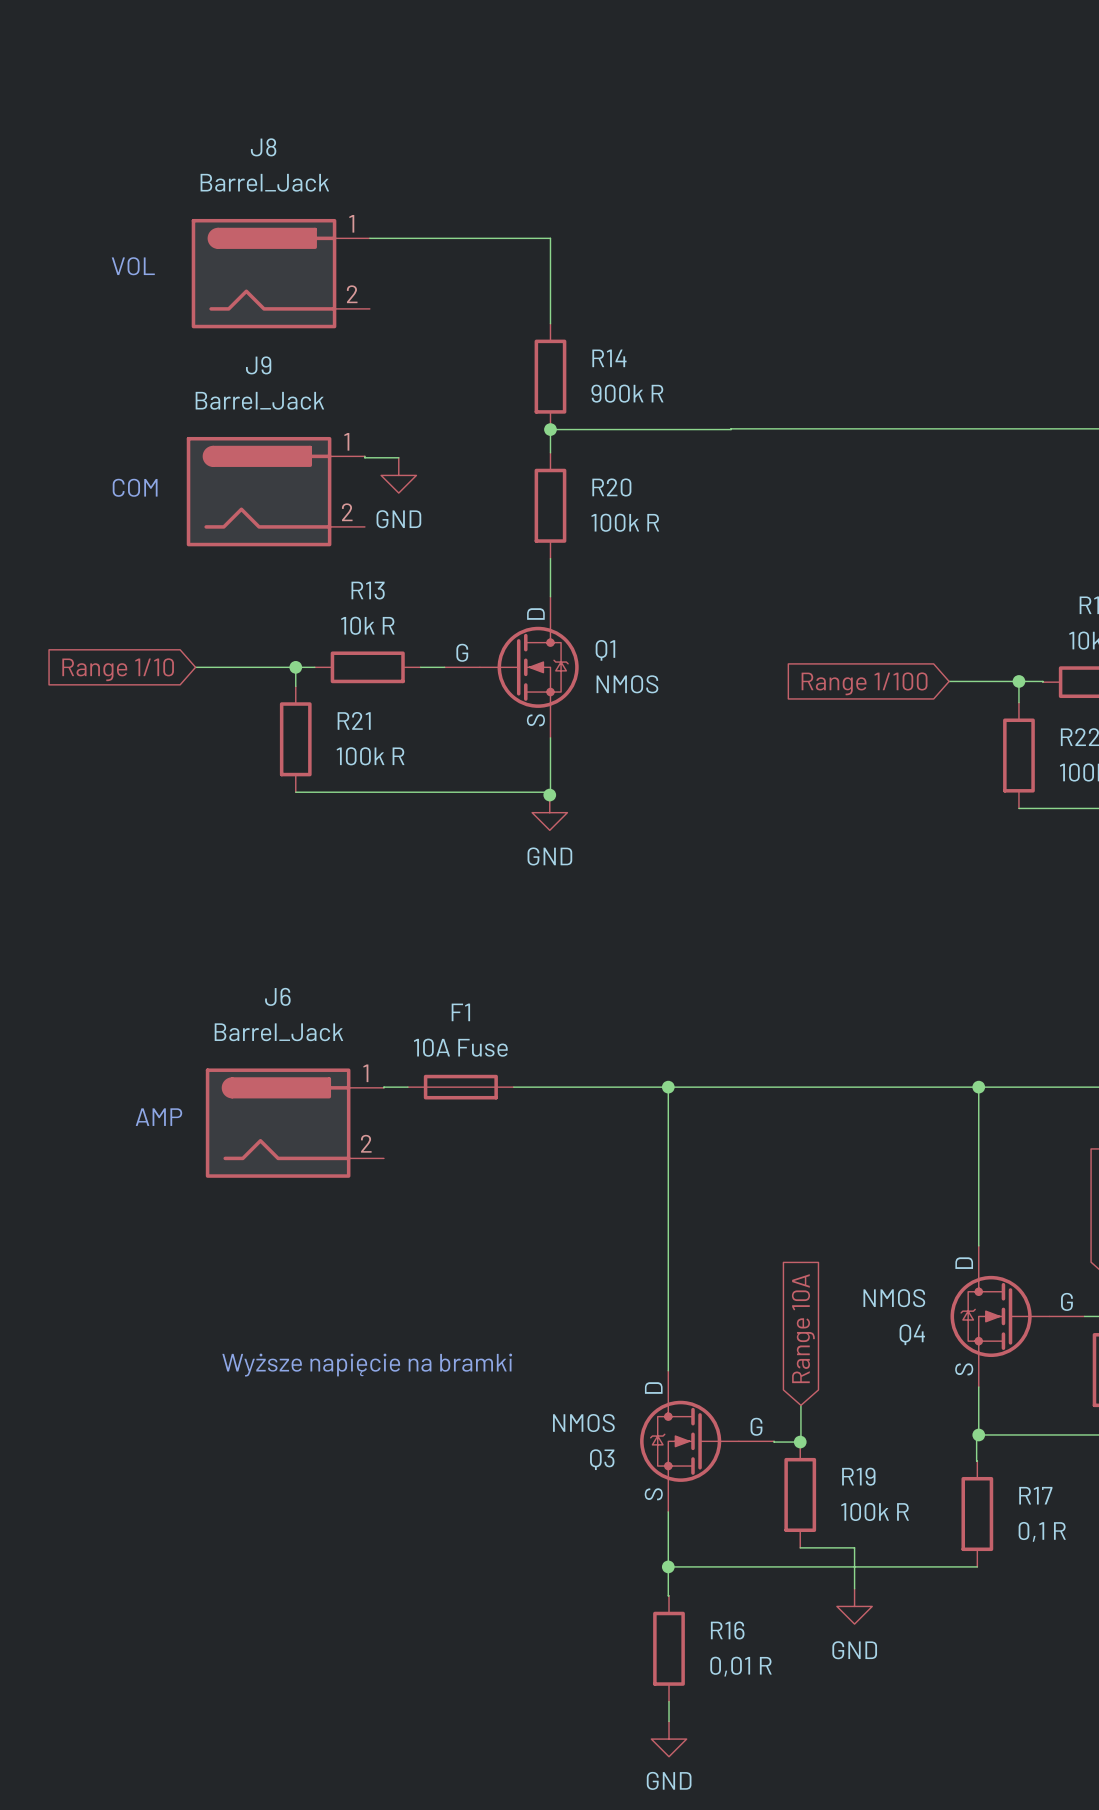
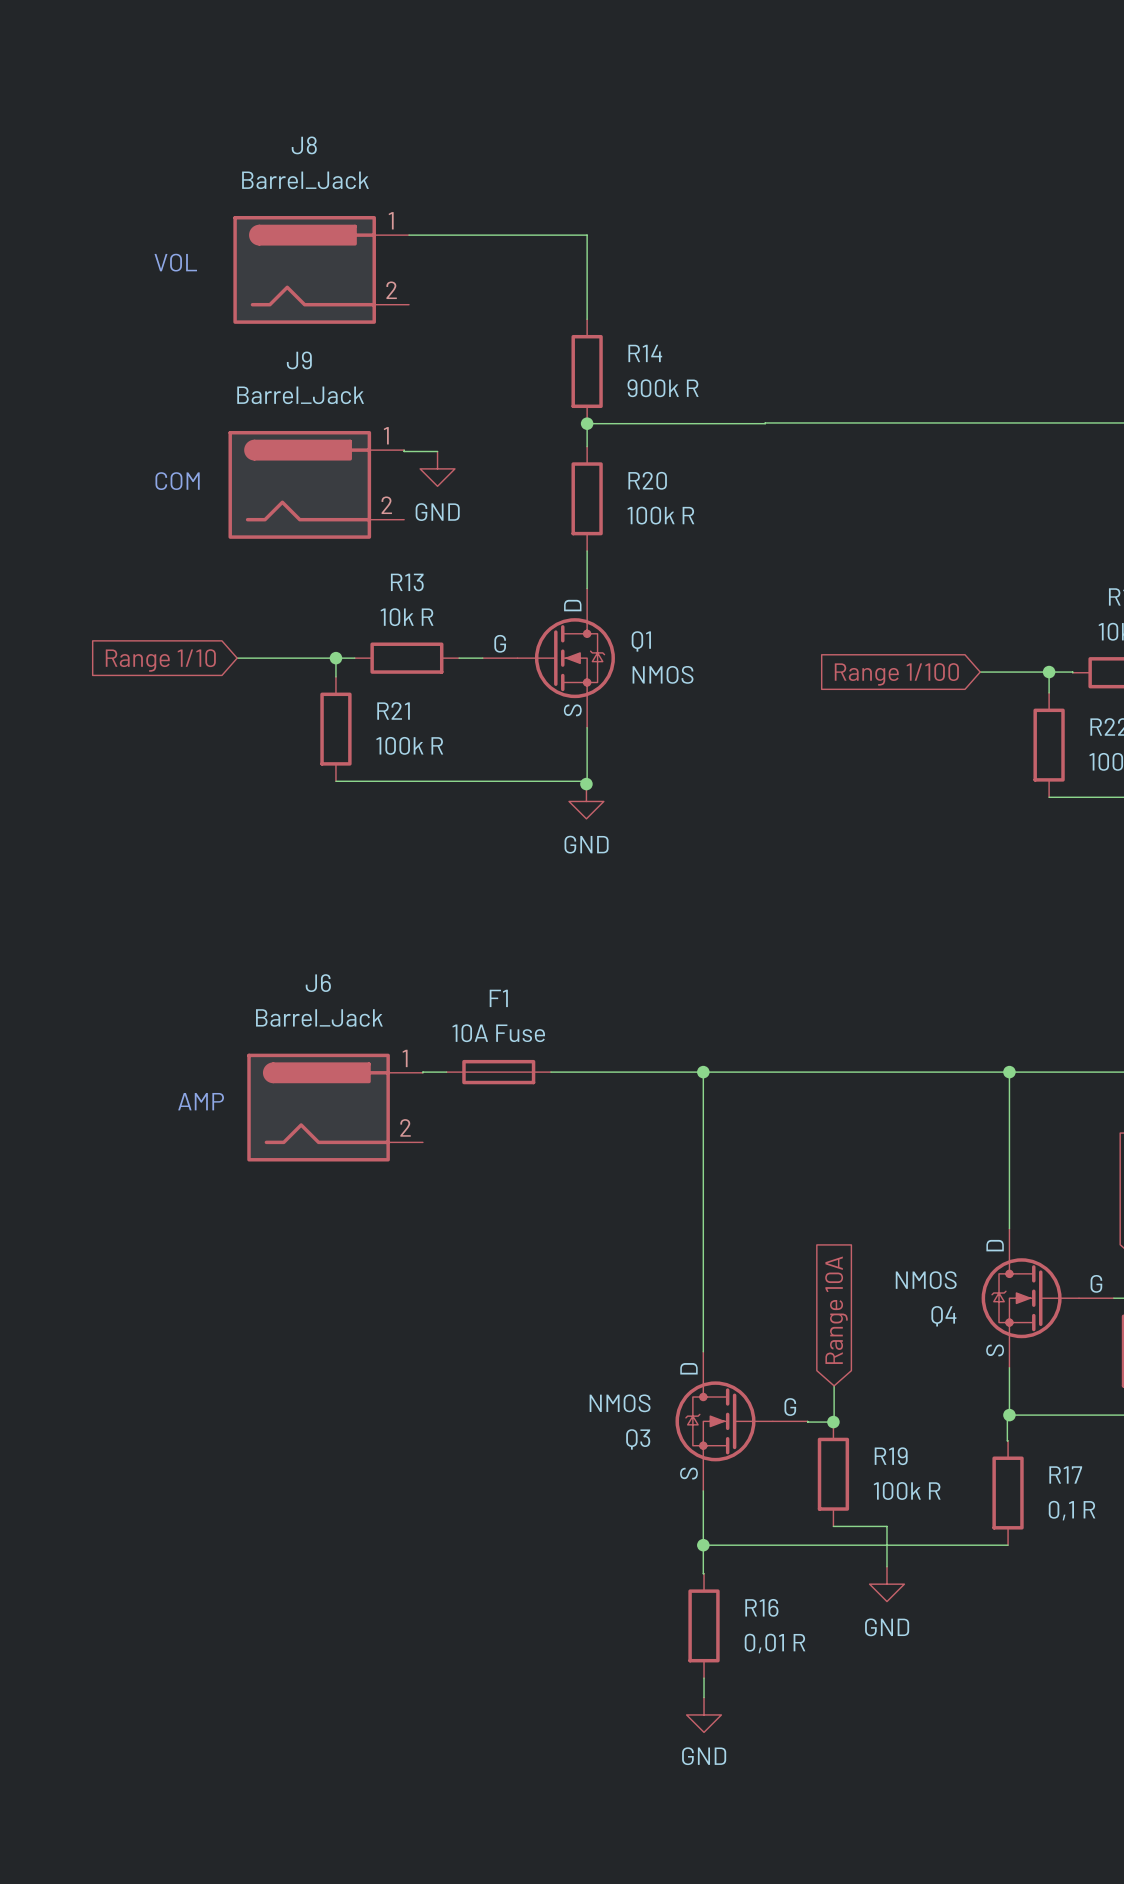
text: Wyższe napięcie na bramki (367, 1365) -> none

